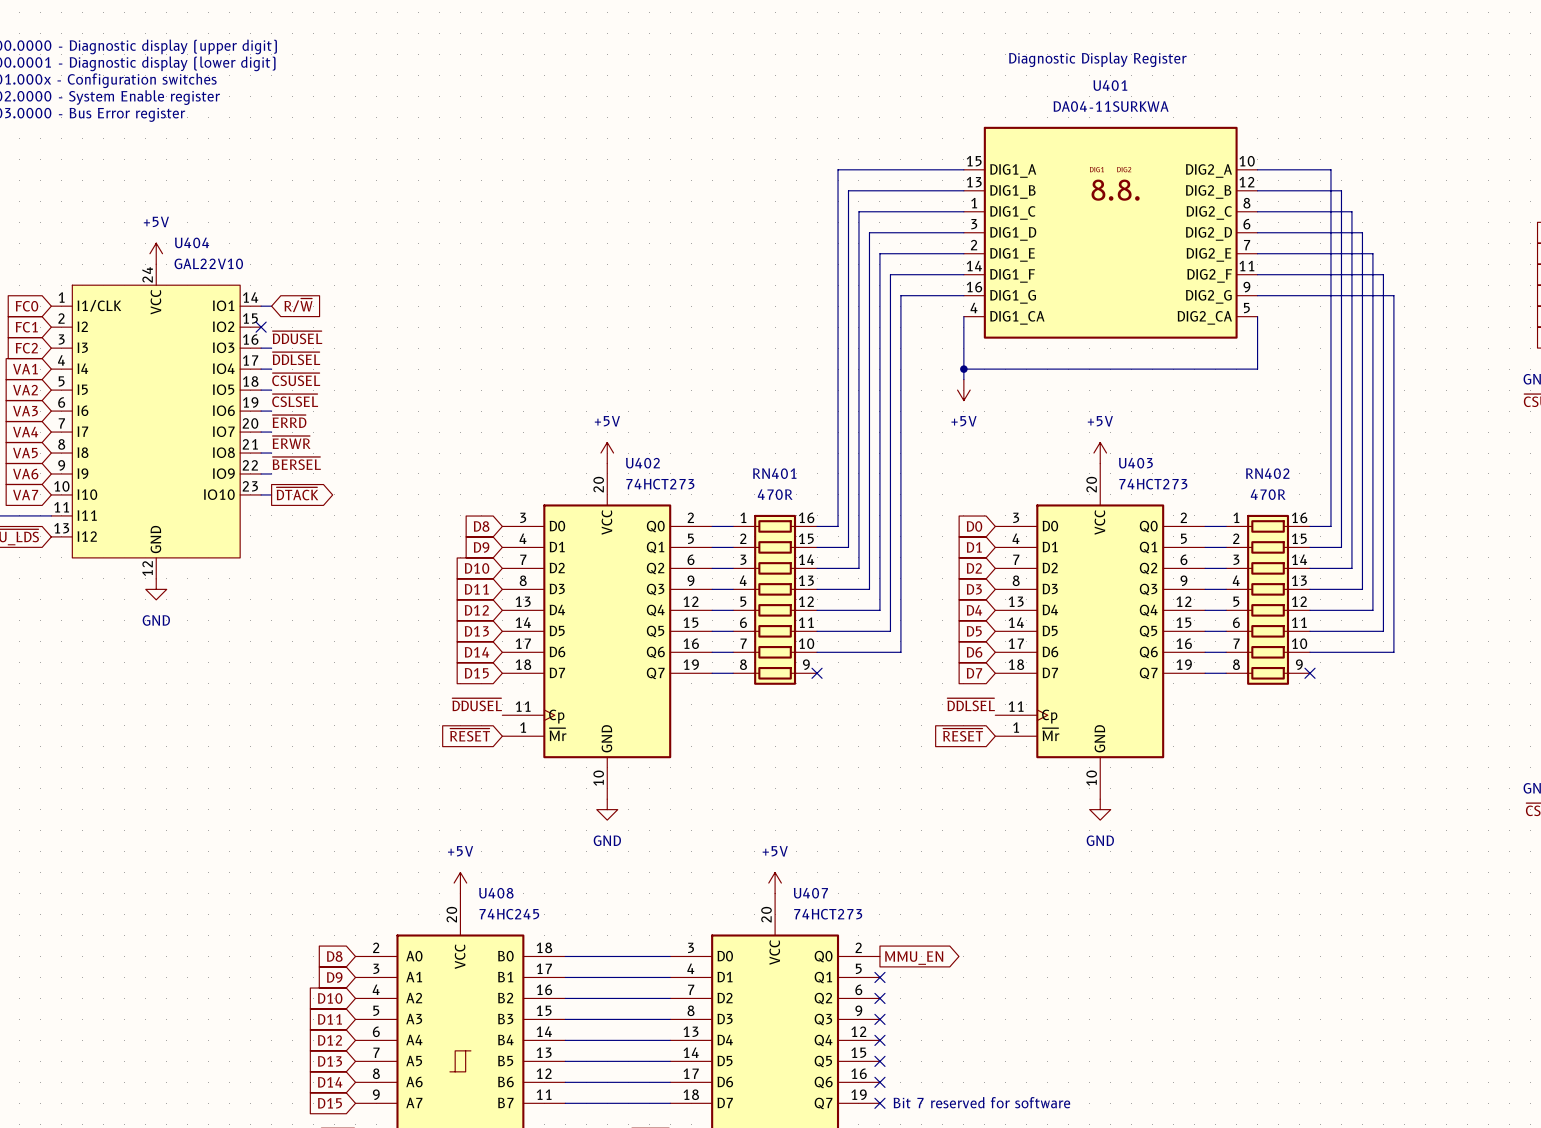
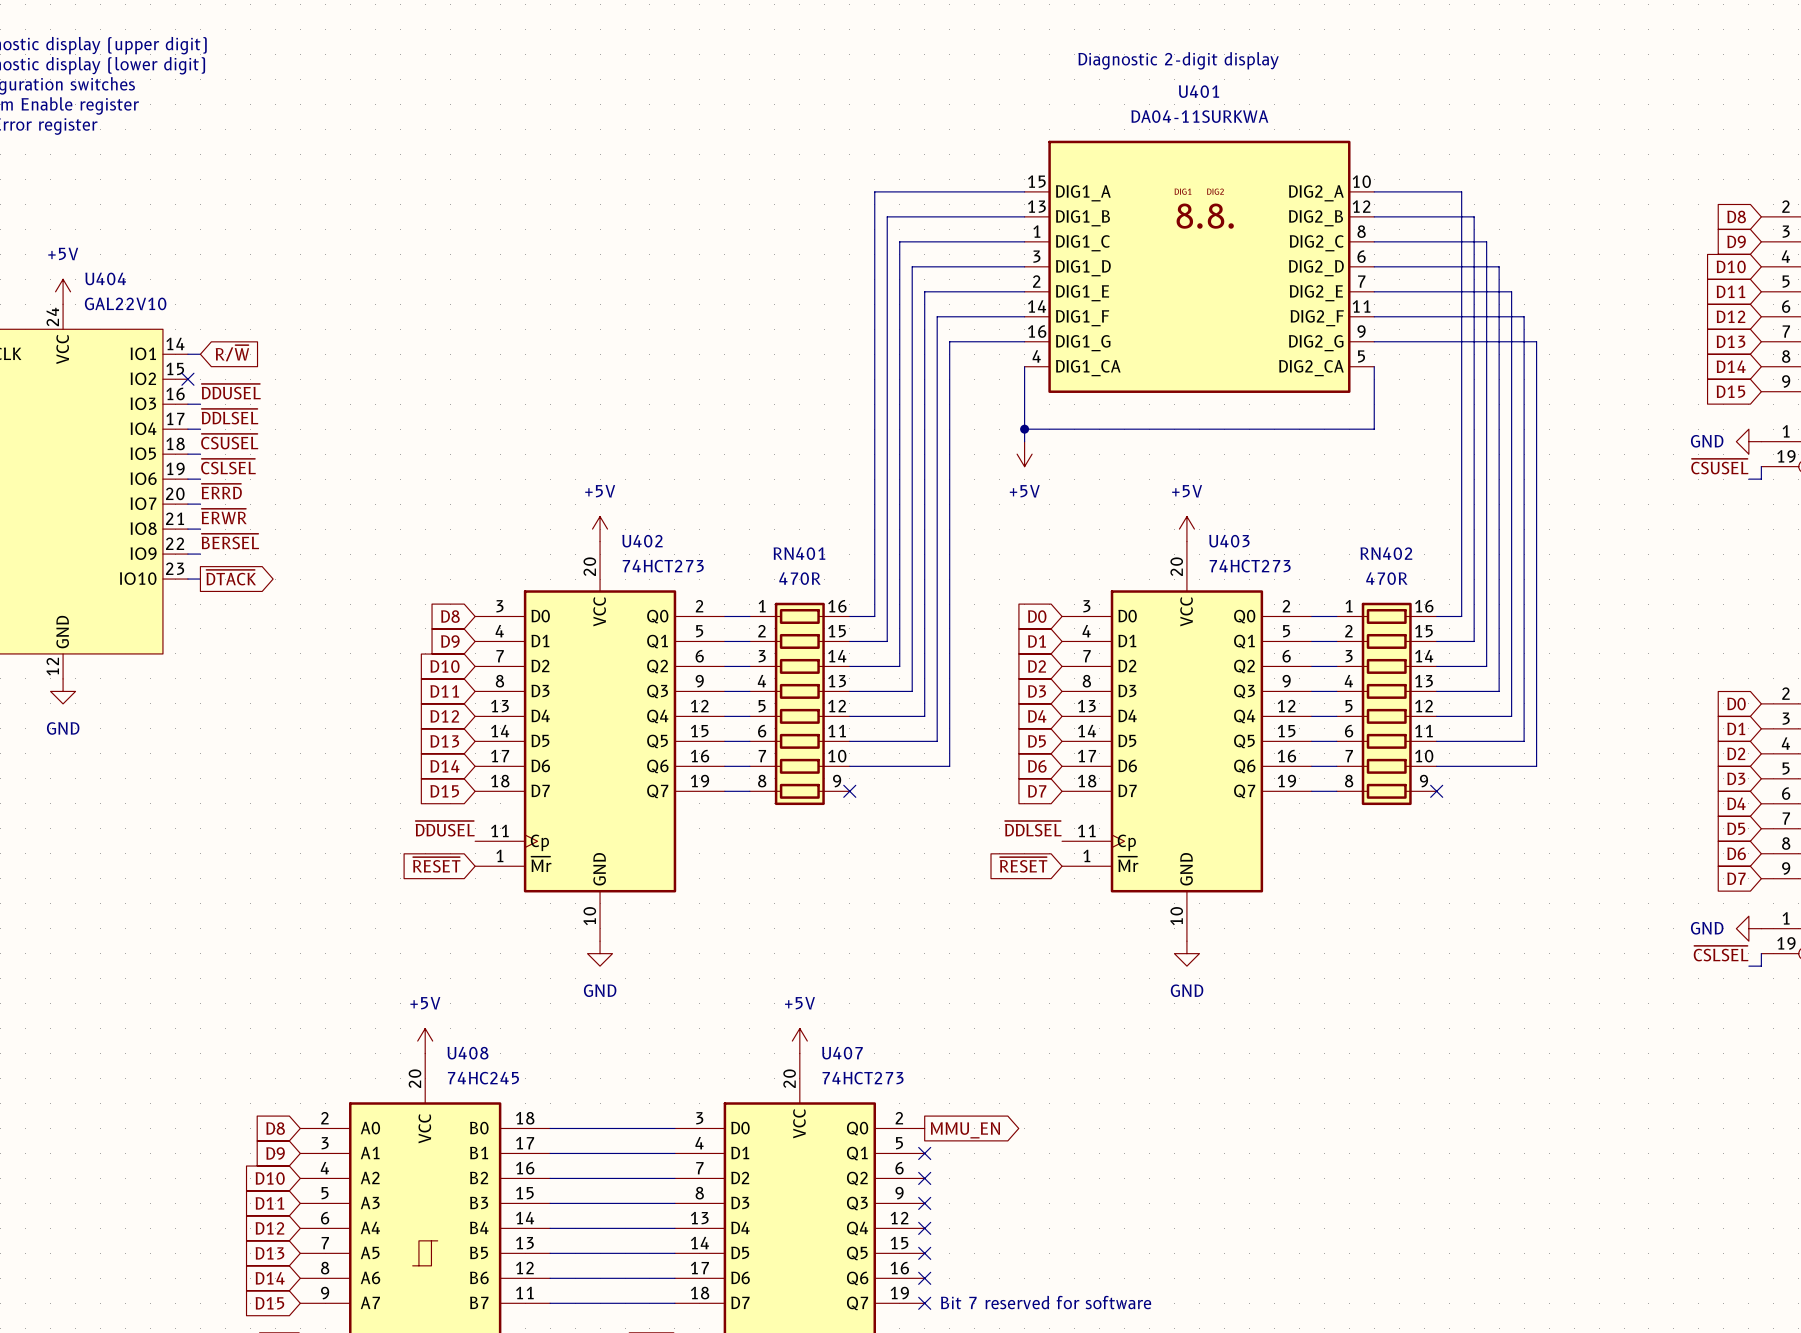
text: Diagnostic Display Register (1097, 59) -> Diagnostic 2-digit display (1178, 60)

